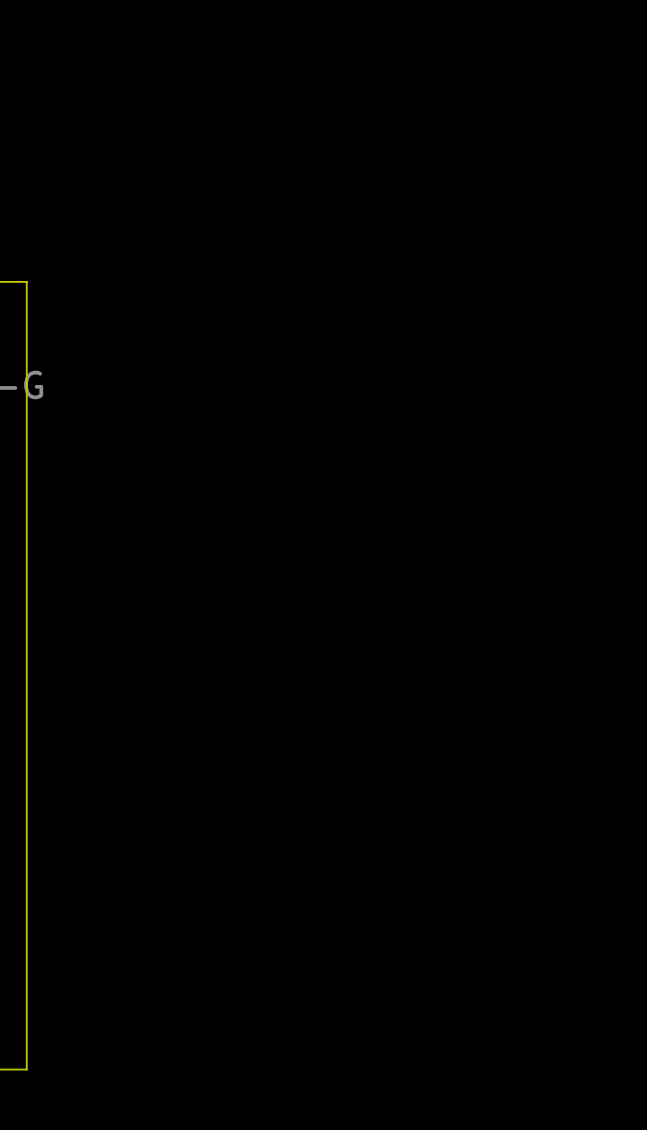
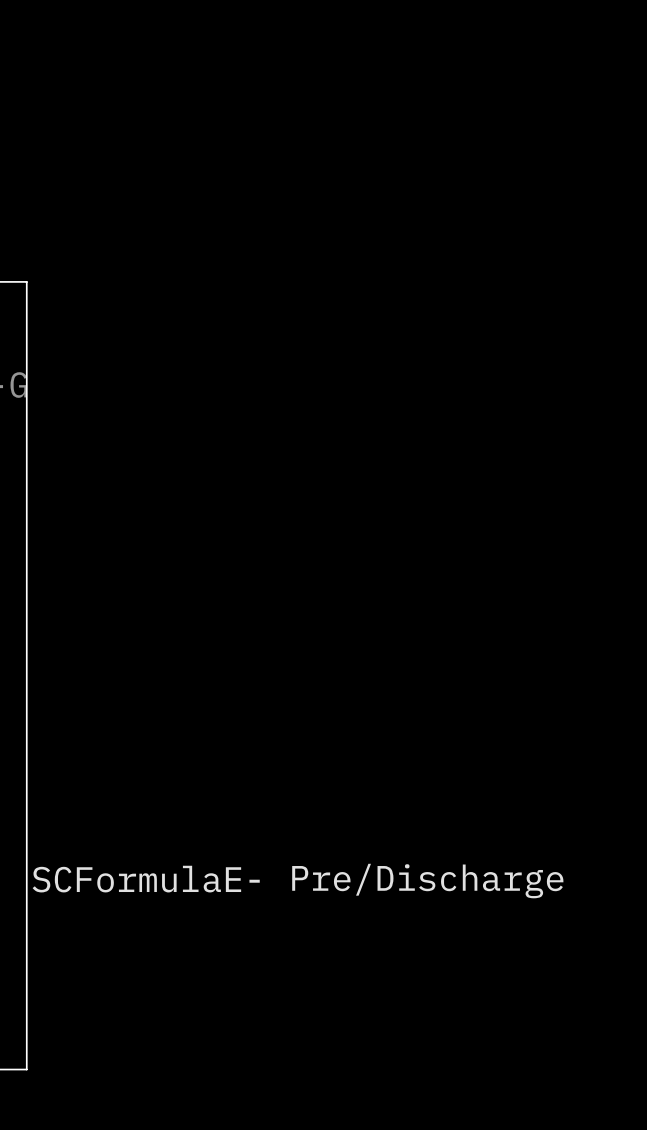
text: none -> SCFormulaE- (146, 879)
text: none -> Pre/Discharge (427, 881)

